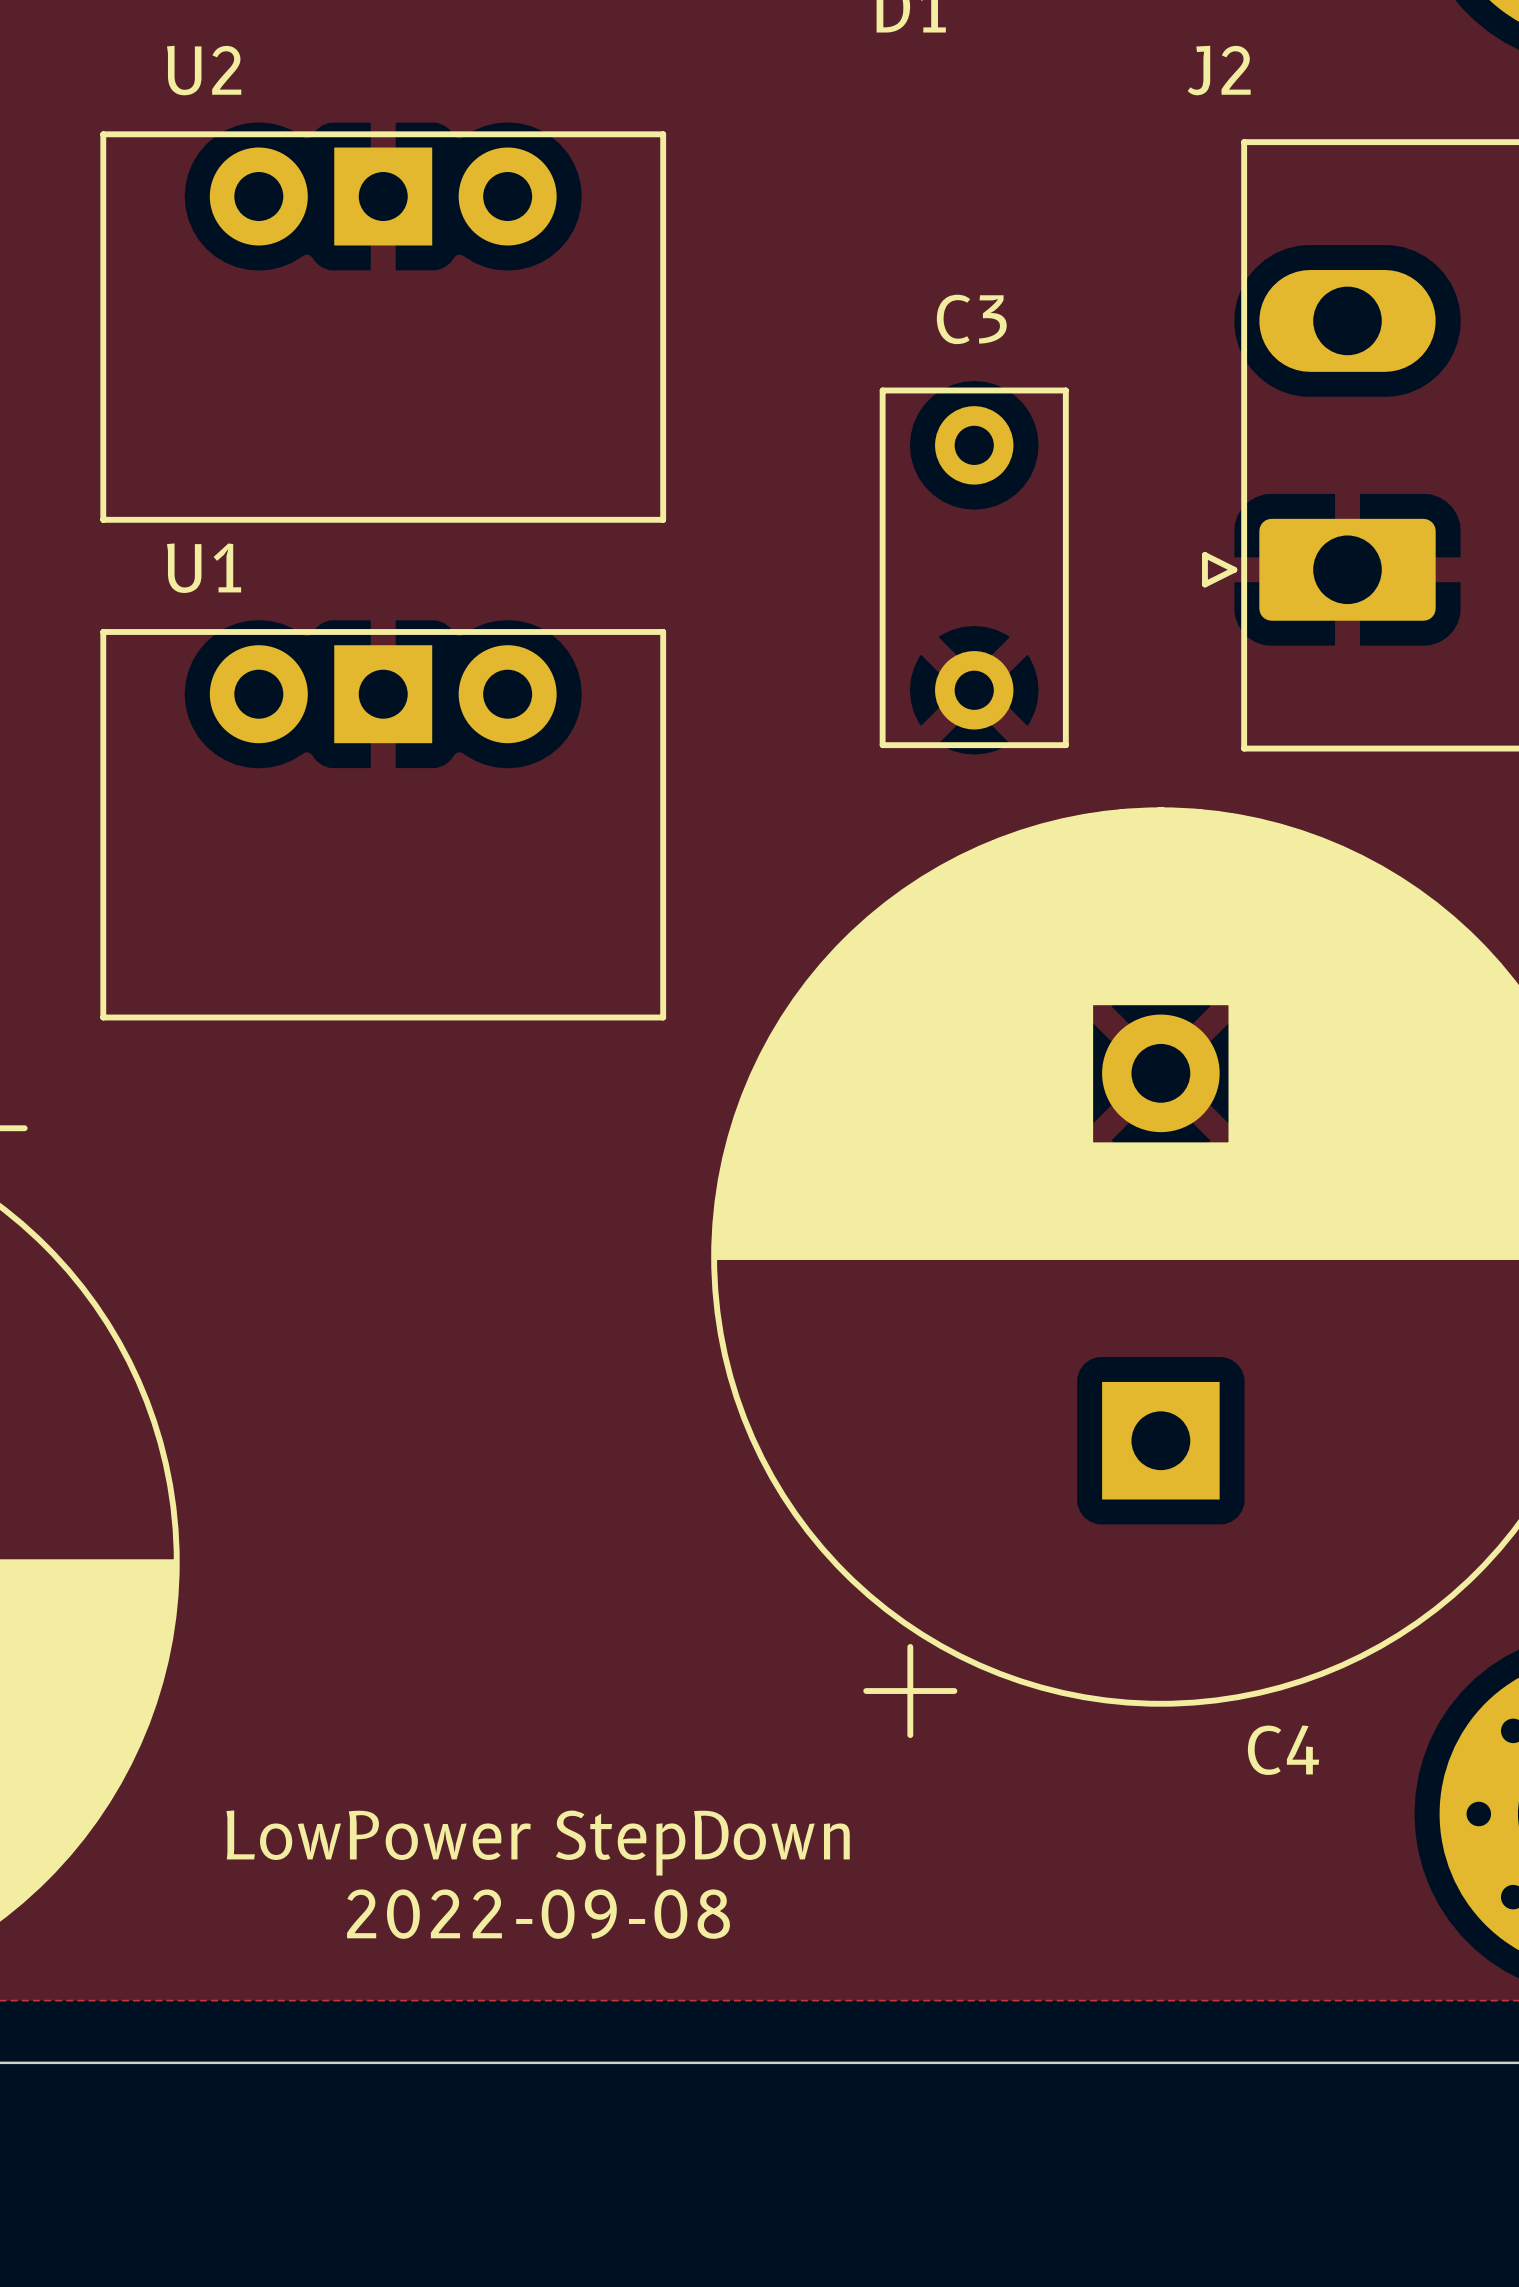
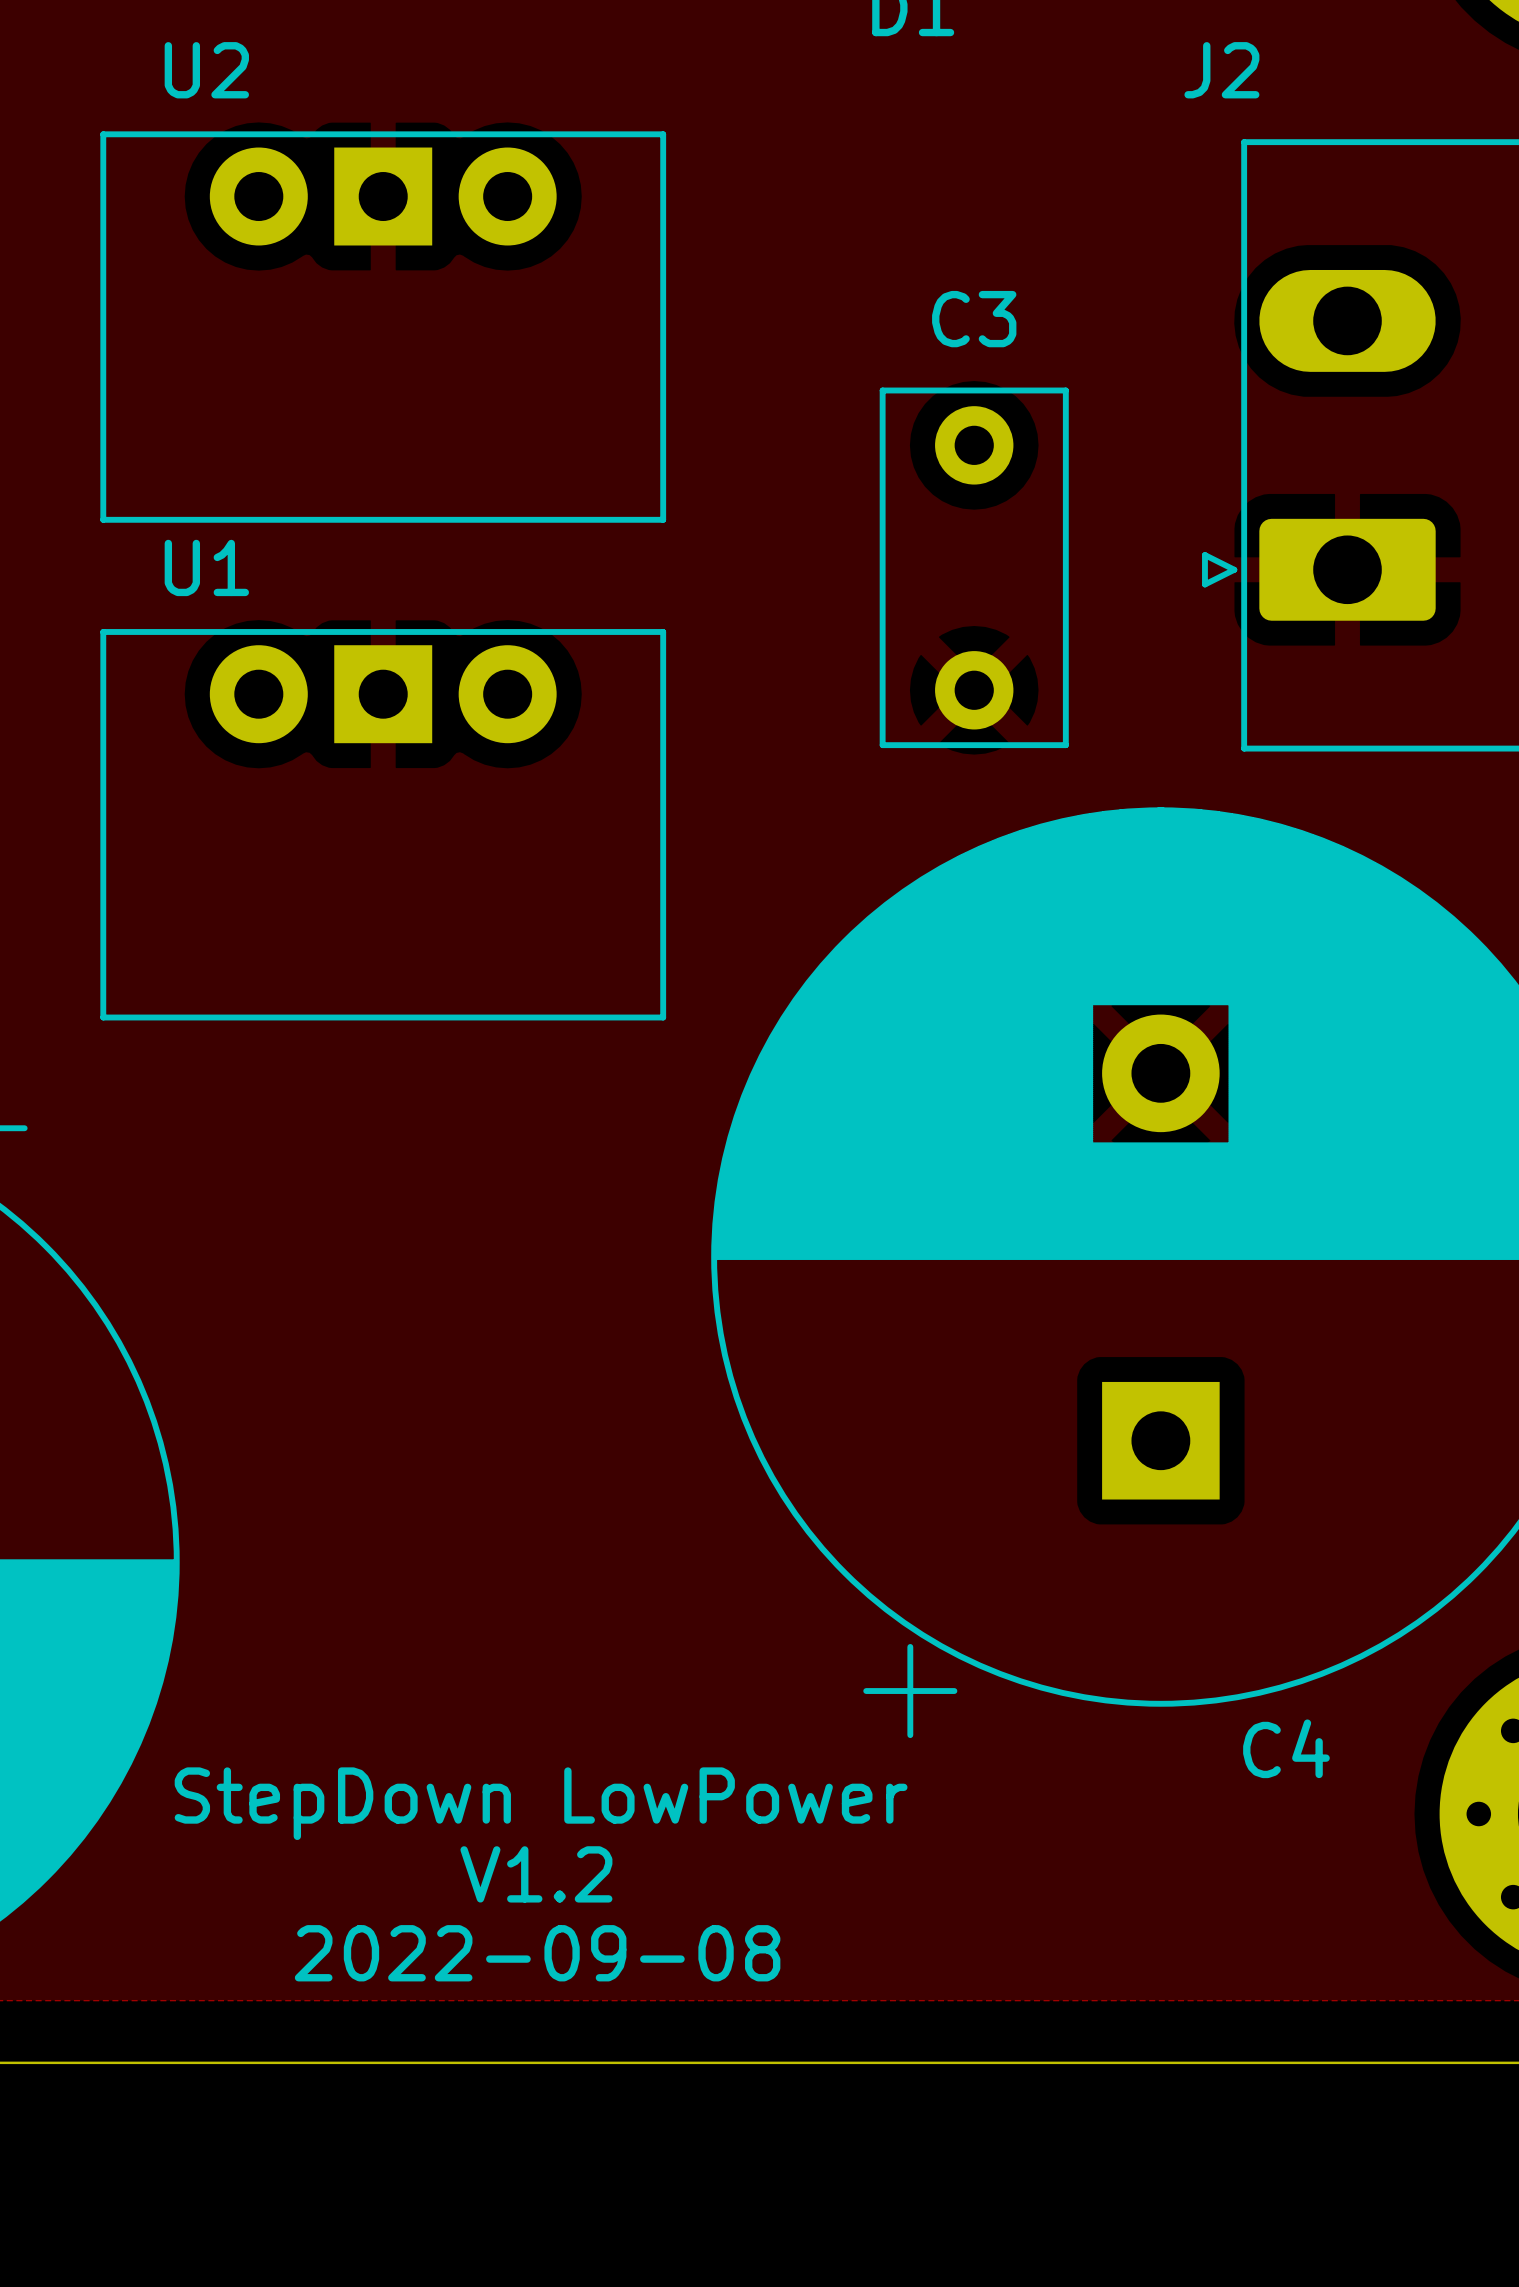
text: none -> StepDown LowPower (541, 1803)
text: LowPower StepDown (538, 1843) -> none
text: none -> V1.2 (536, 1874)
text position: 2022-09-08 (538, 1914) -> 2022-09-08 (537, 1953)

